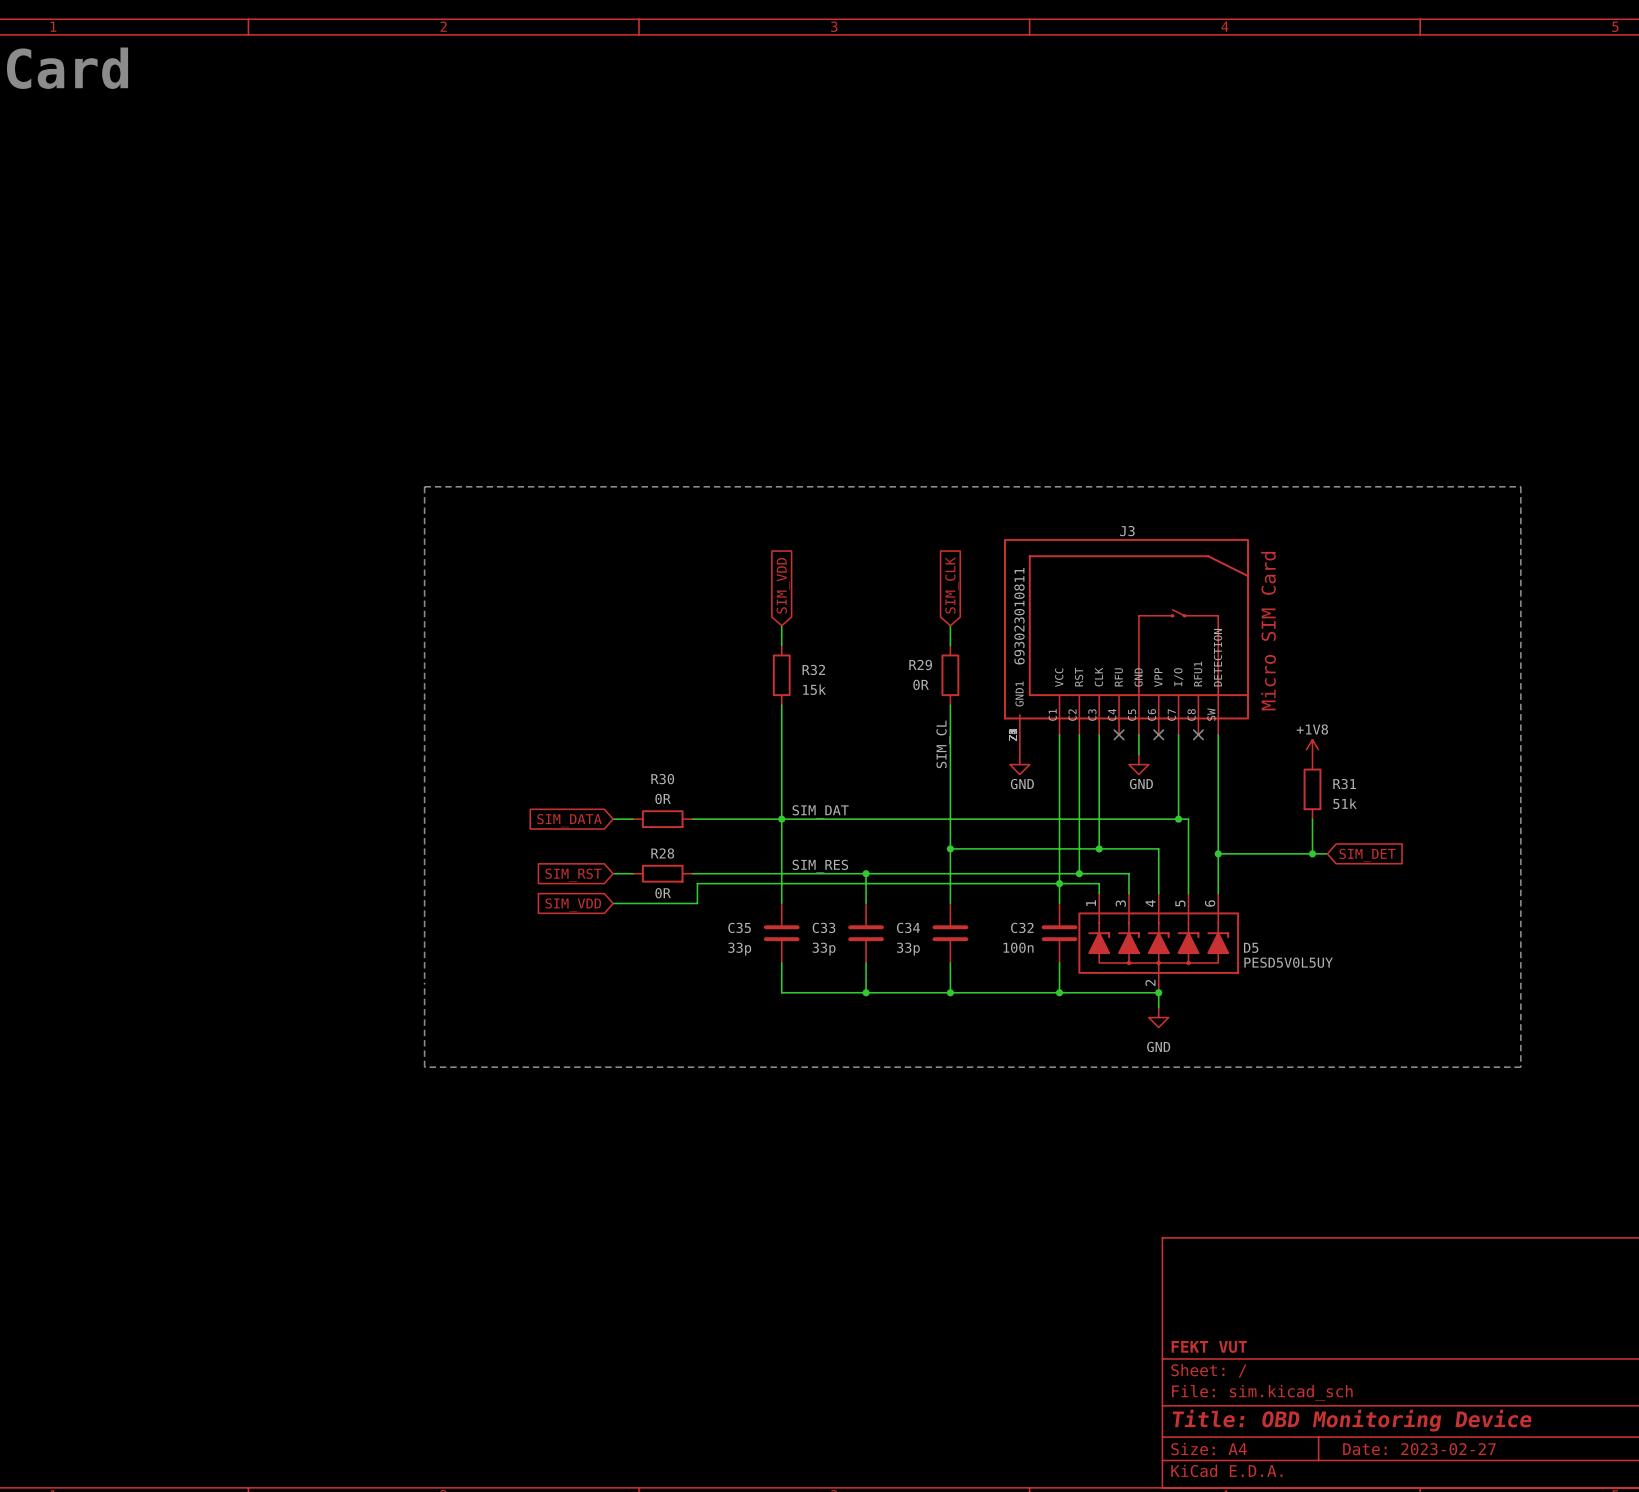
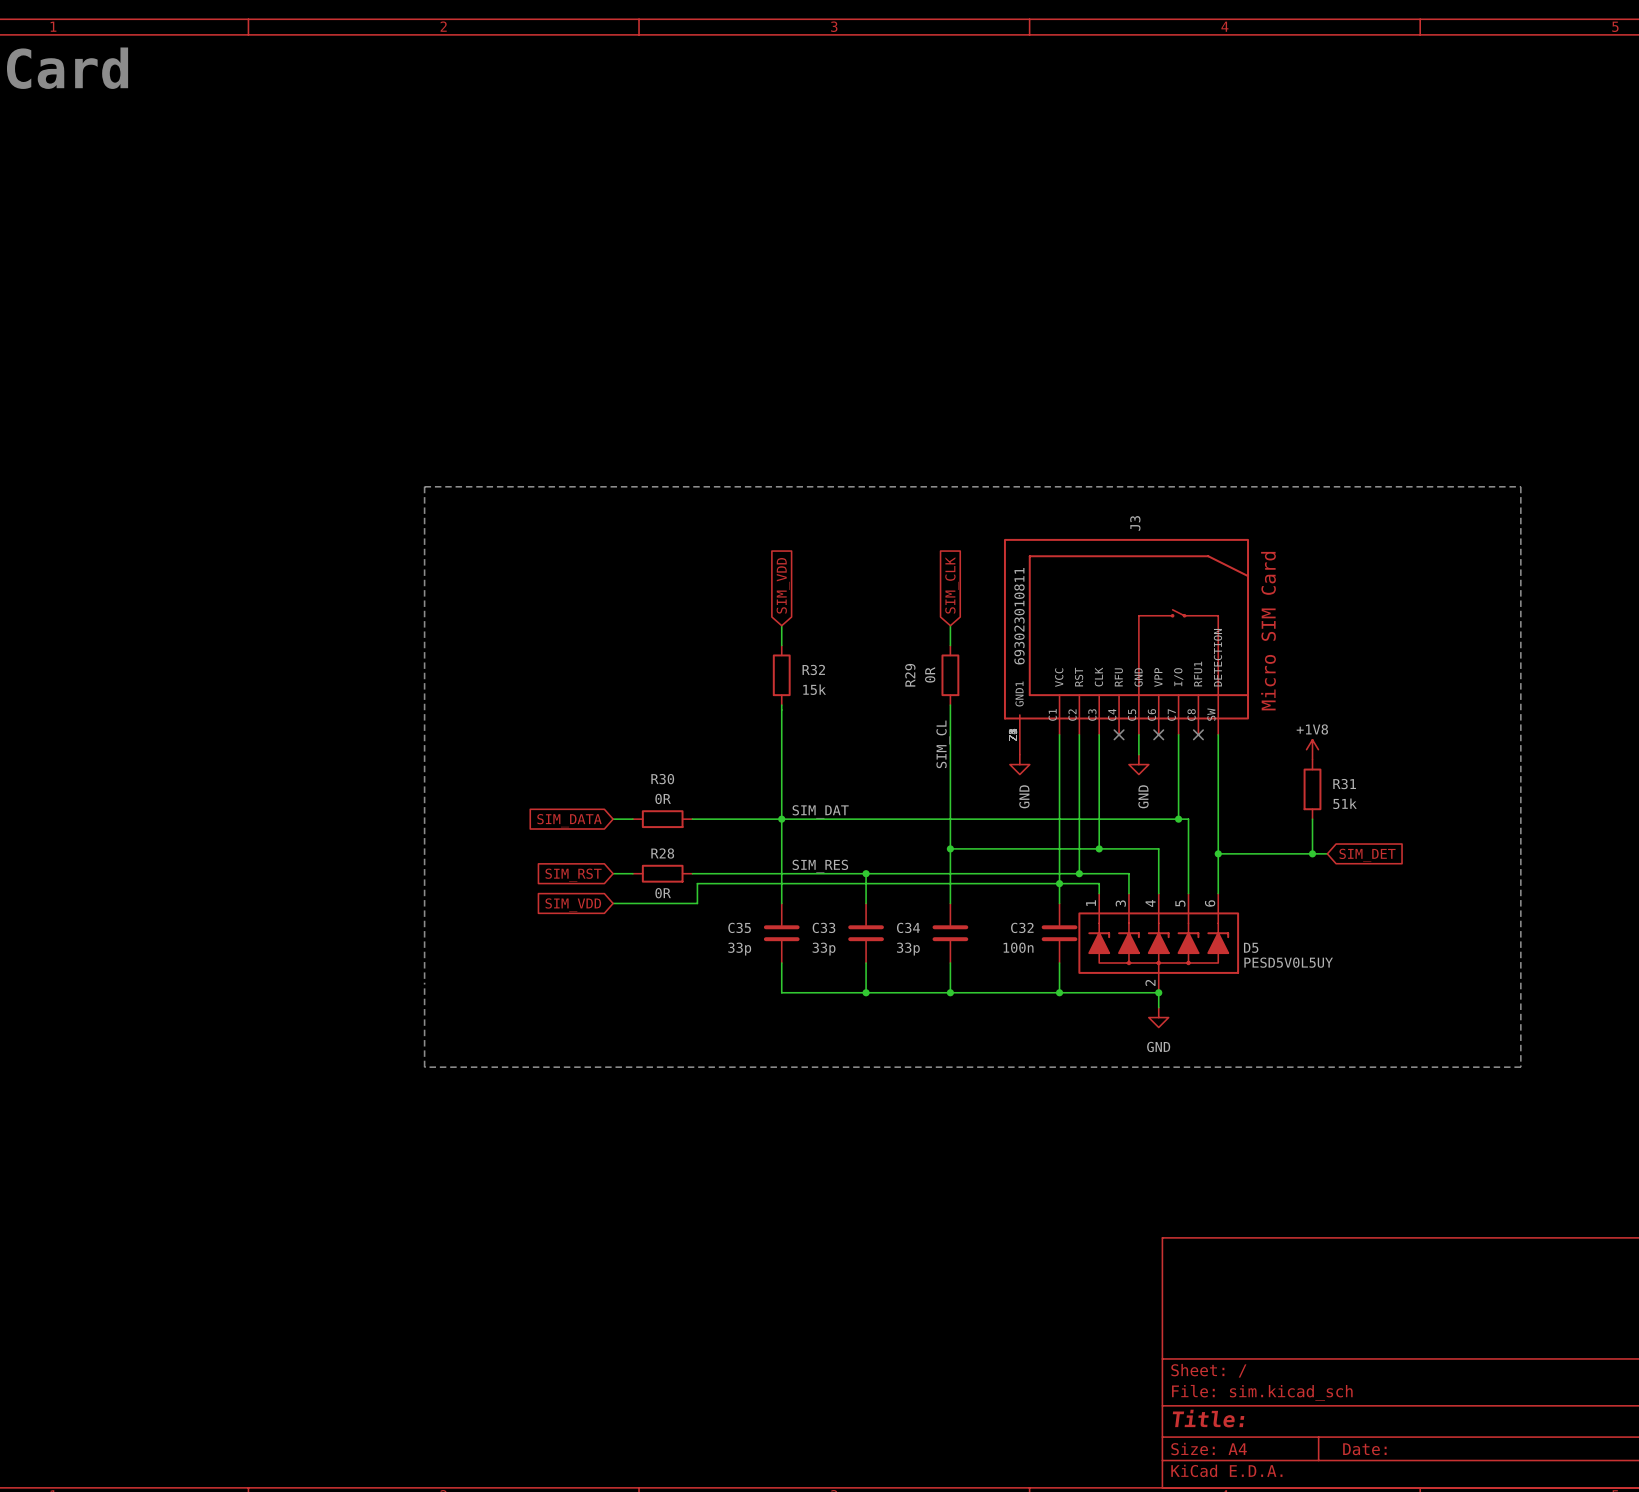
J3 name rotation: 0° (1127, 531) -> 90° counterclockwise (1135, 523)
R29 name rotation: 0° (920, 665) -> 90° counterclockwise (910, 675)
R29 value rotation: 0° (921, 684) -> 90° counterclockwise (930, 674)
power symbol text rotation: 0° (1022, 784) -> 90° counterclockwise (1024, 796)
power symbol text rotation: 0° (1141, 784) -> 90° counterclockwise (1143, 796)
title block: FEKT VUT (1209, 1346) -> none
title block: Title: OBD Monitoring Device (1352, 1420) -> Title: (1208, 1418)
title block: Date: 2023-02-27 (1419, 1449) -> Date: (1364, 1449)

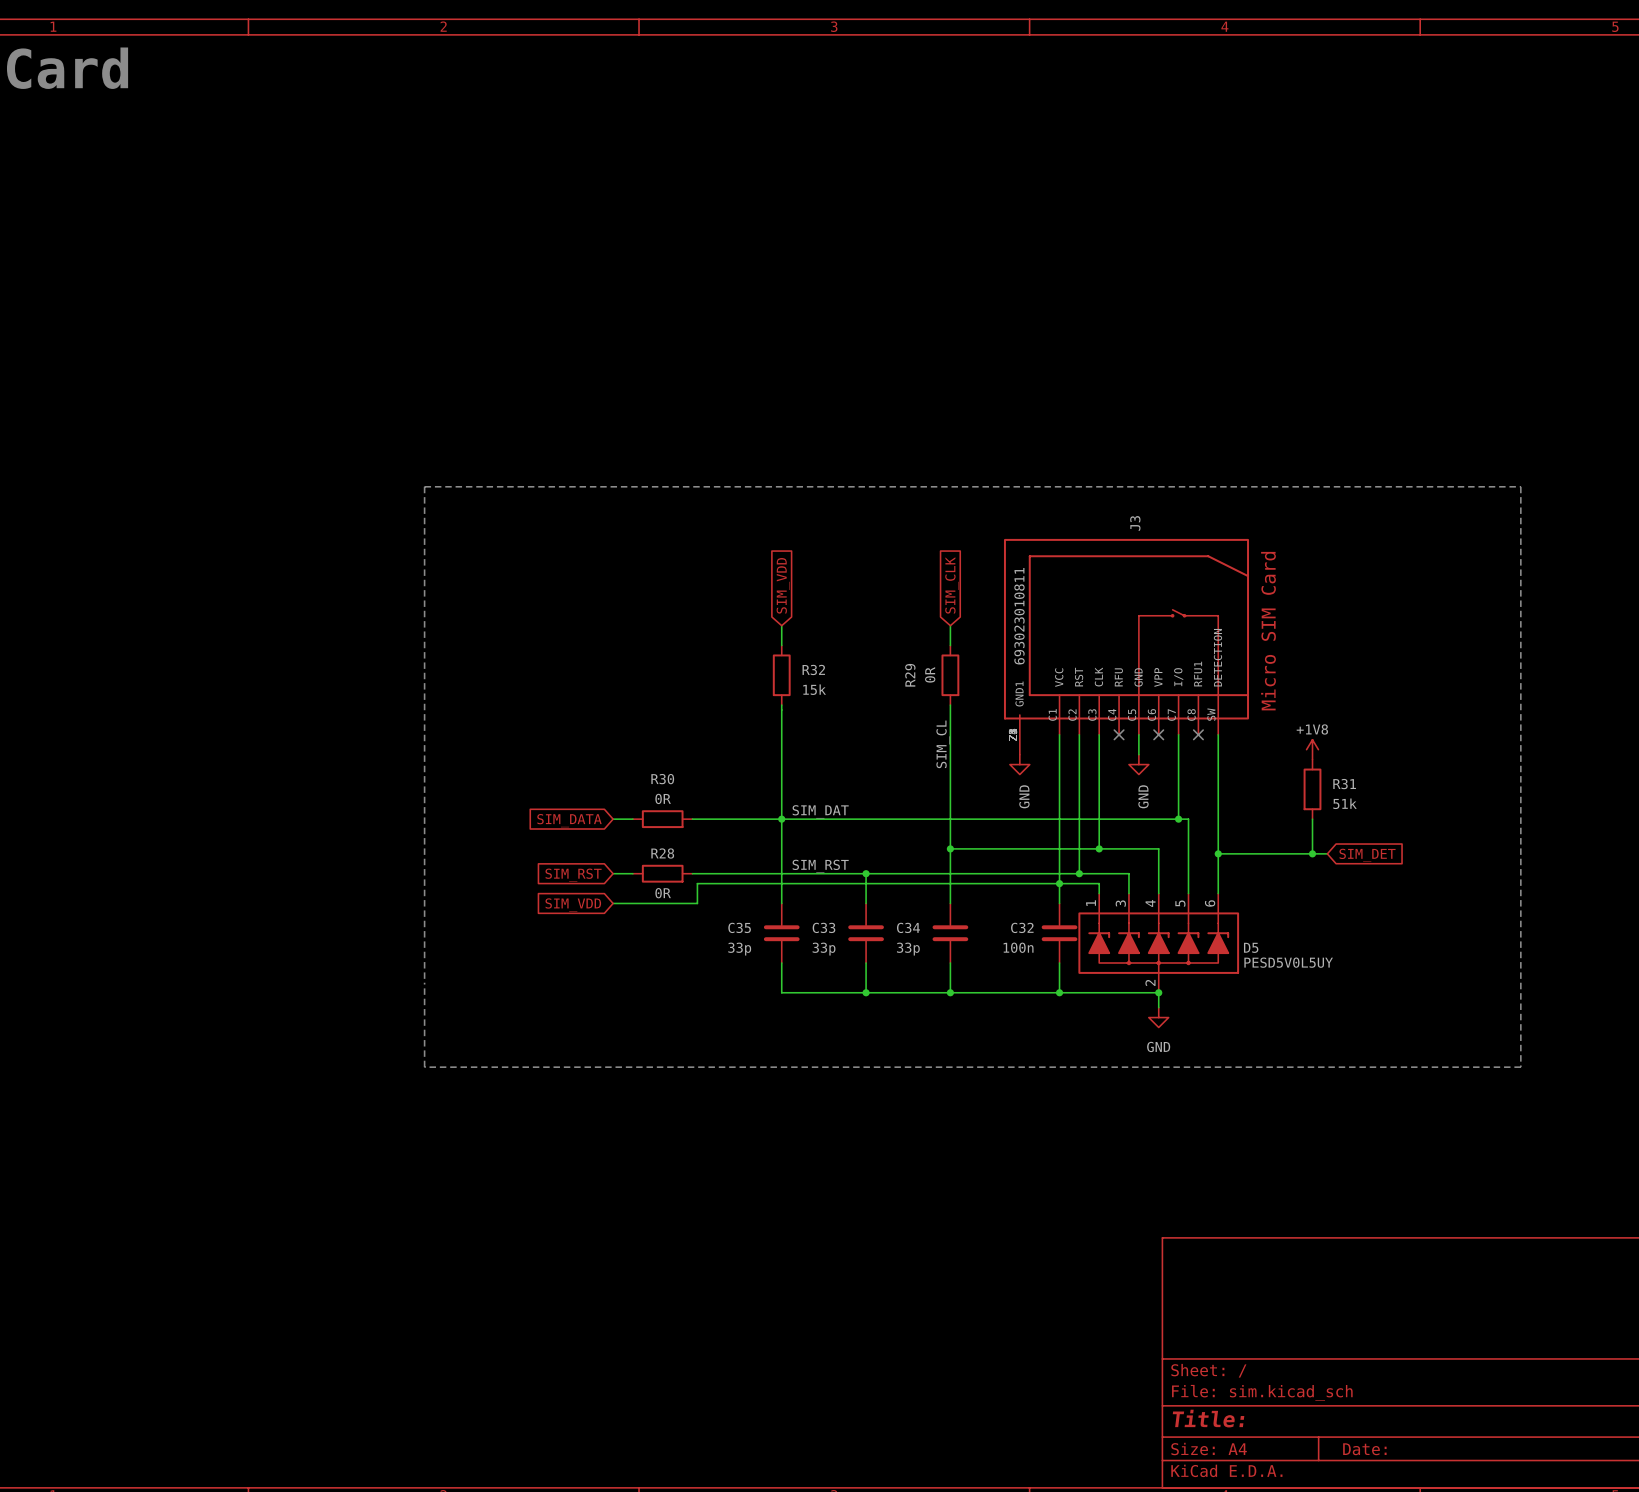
label: SIM_RES (820, 866) -> SIM_RST (820, 866)

